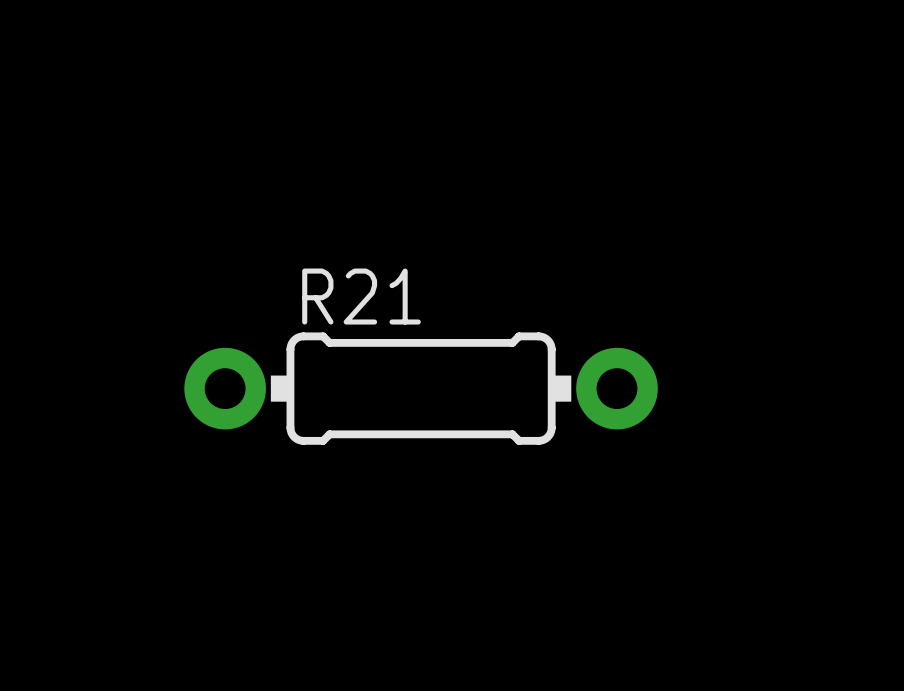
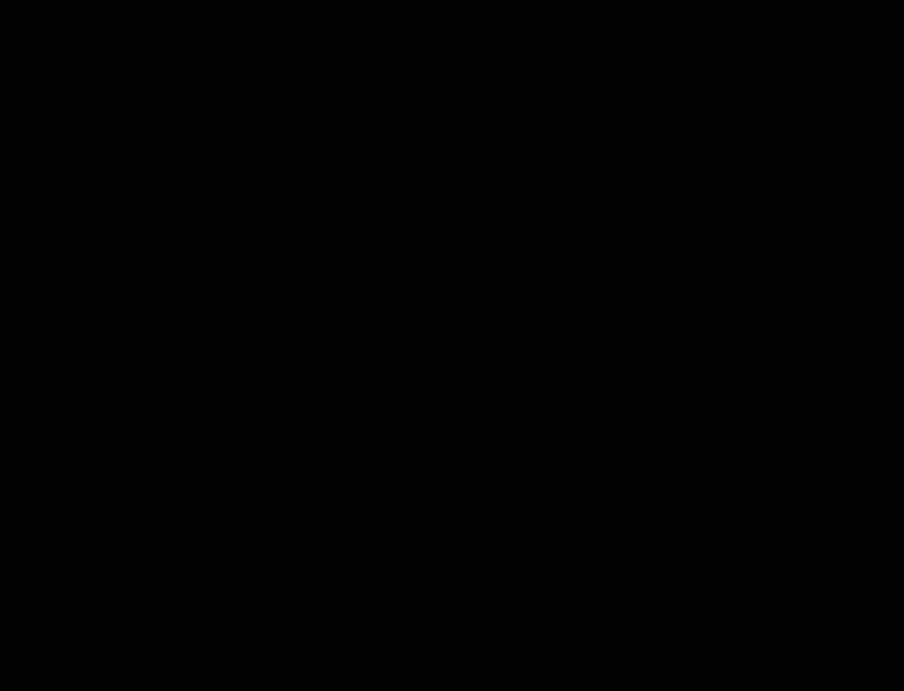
R21: (421, 388) -> none

